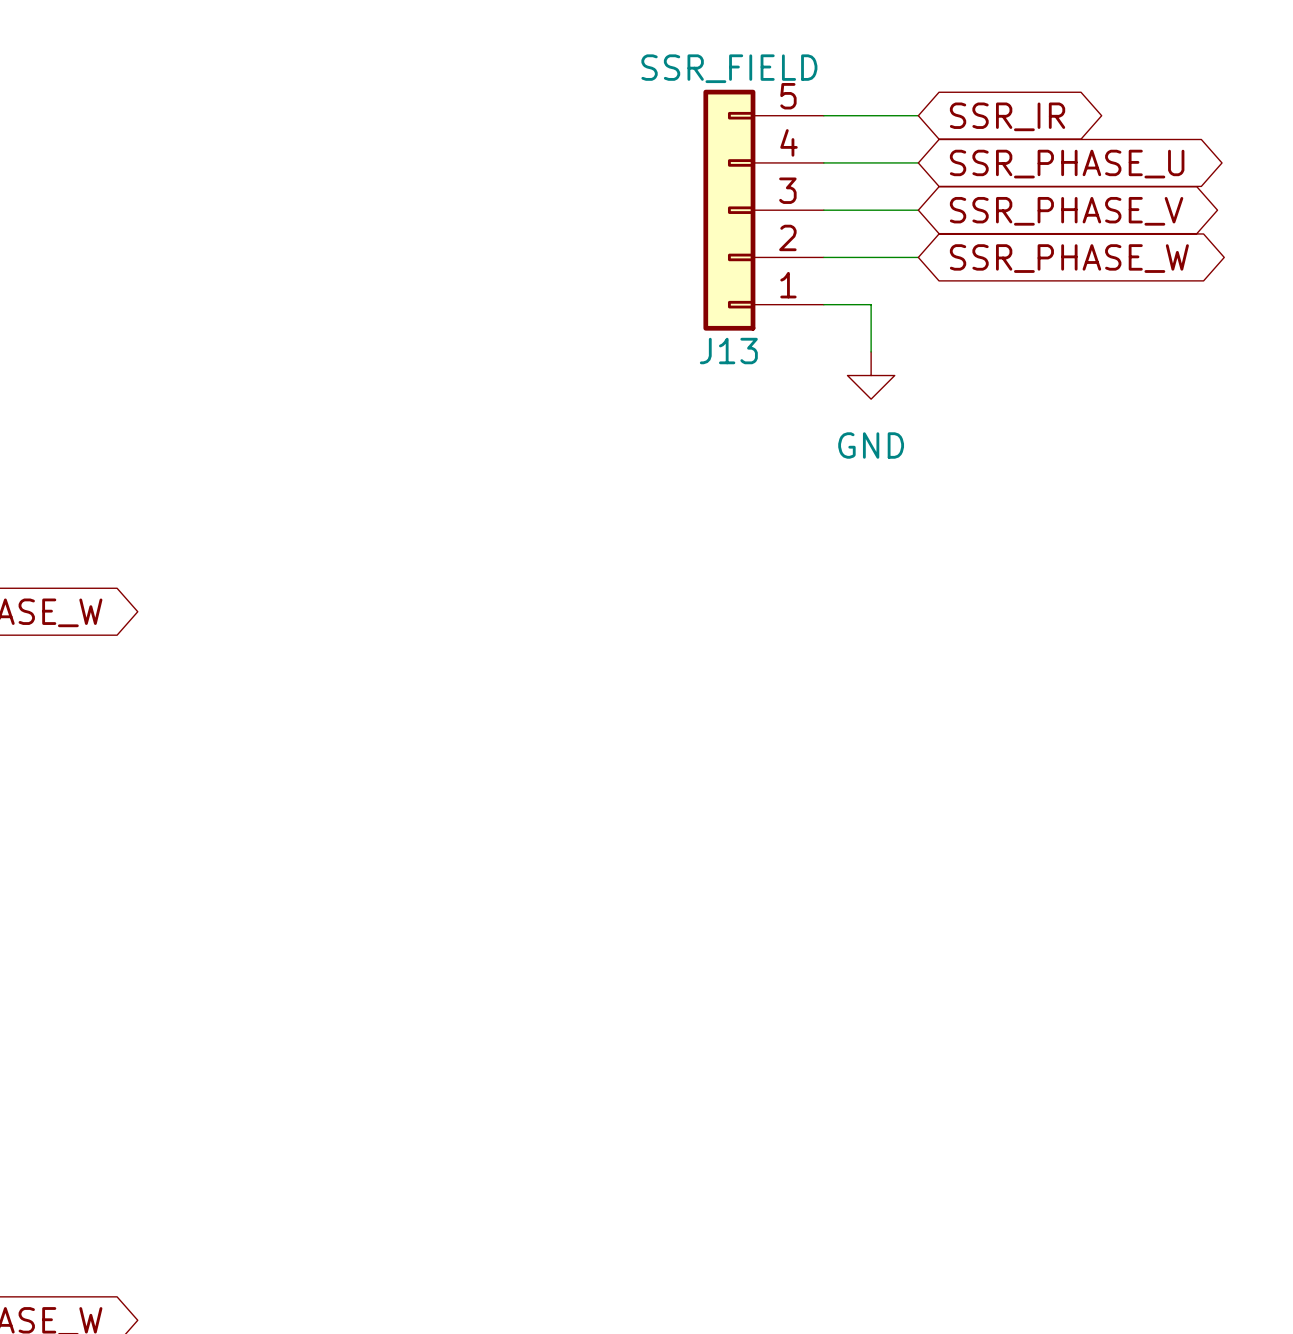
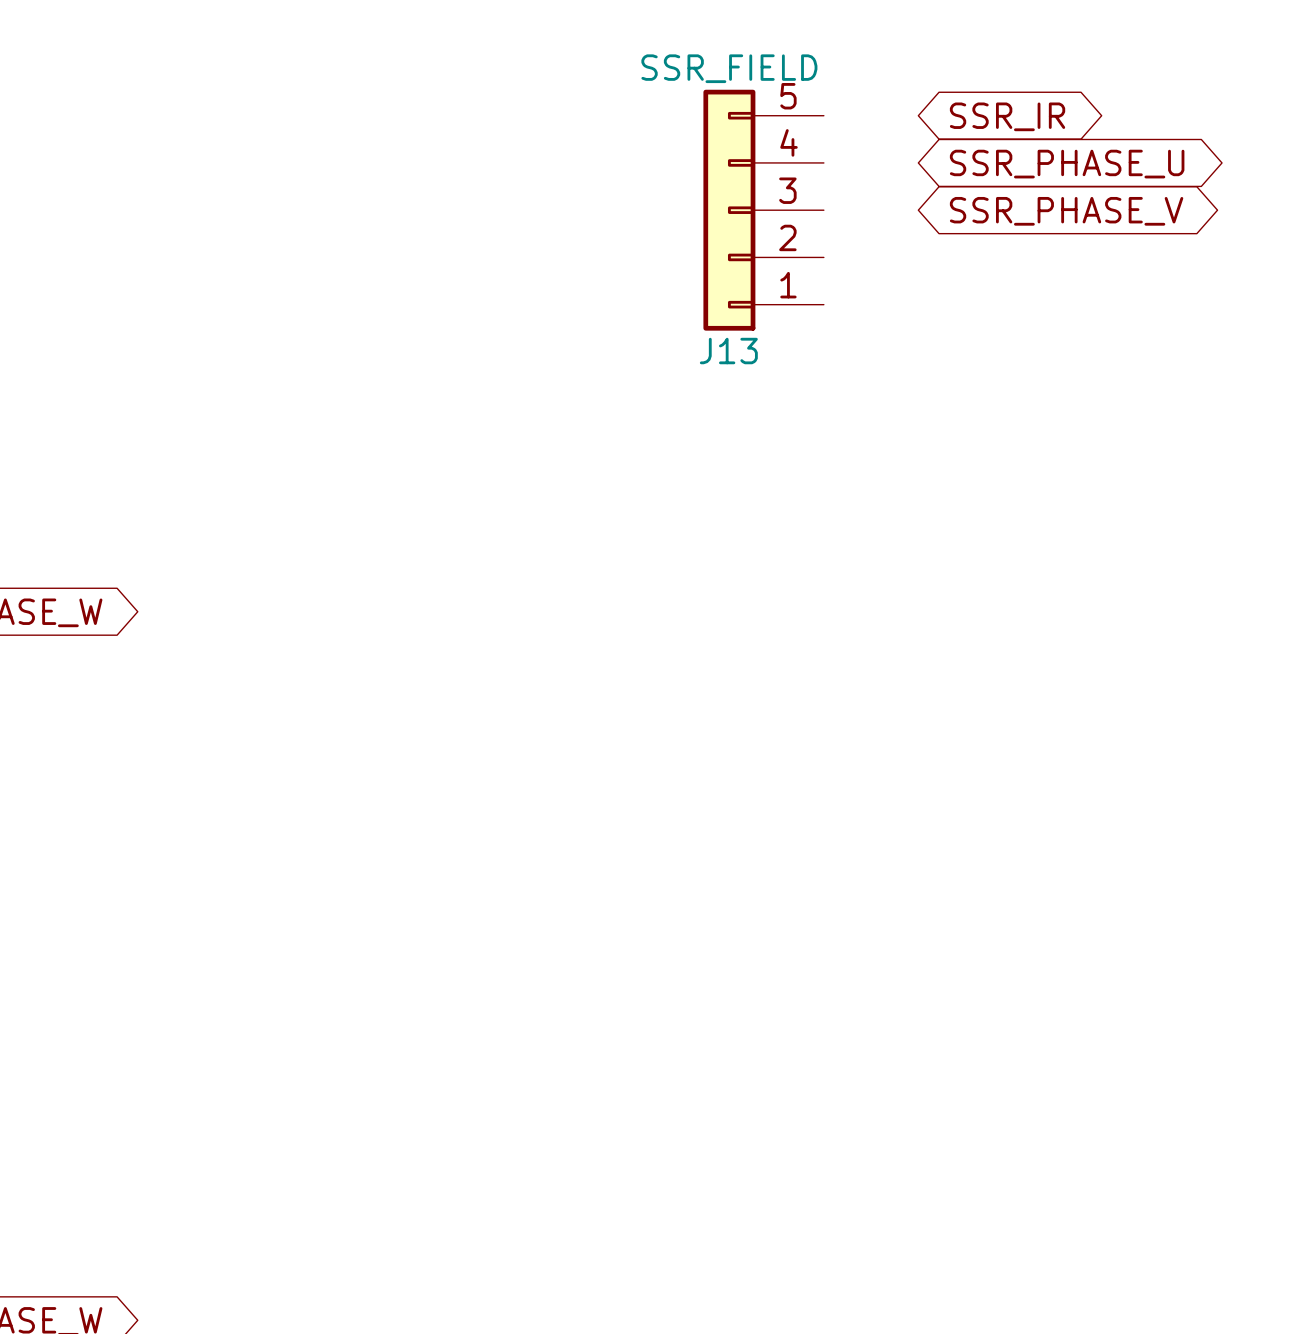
wire: (823, 115) (918, 115) -> none
wire: (823, 162) (918, 162) -> none
wire: (823, 210) (918, 210) -> none
wire: (823, 257) (918, 257) -> none
global label: SSR_PHASE_W (1069, 258) -> none
wire: (823, 304) (871, 304) (871, 351) -> none
power symbol: GND (871, 375) -> none

